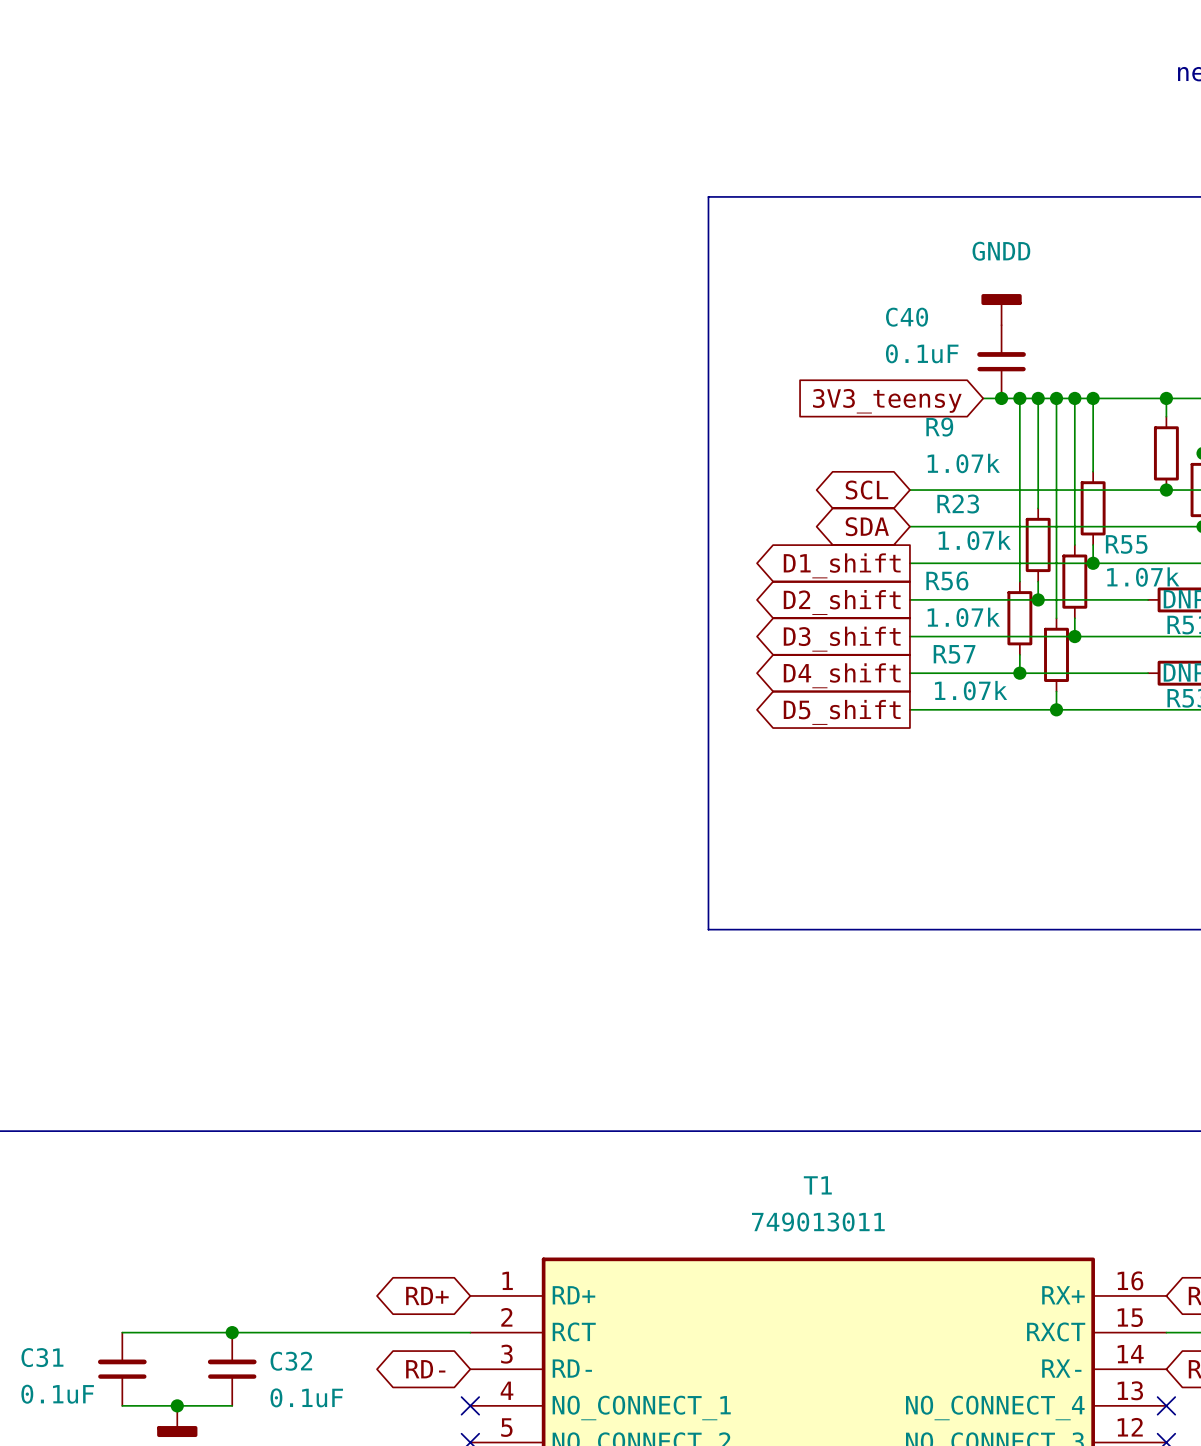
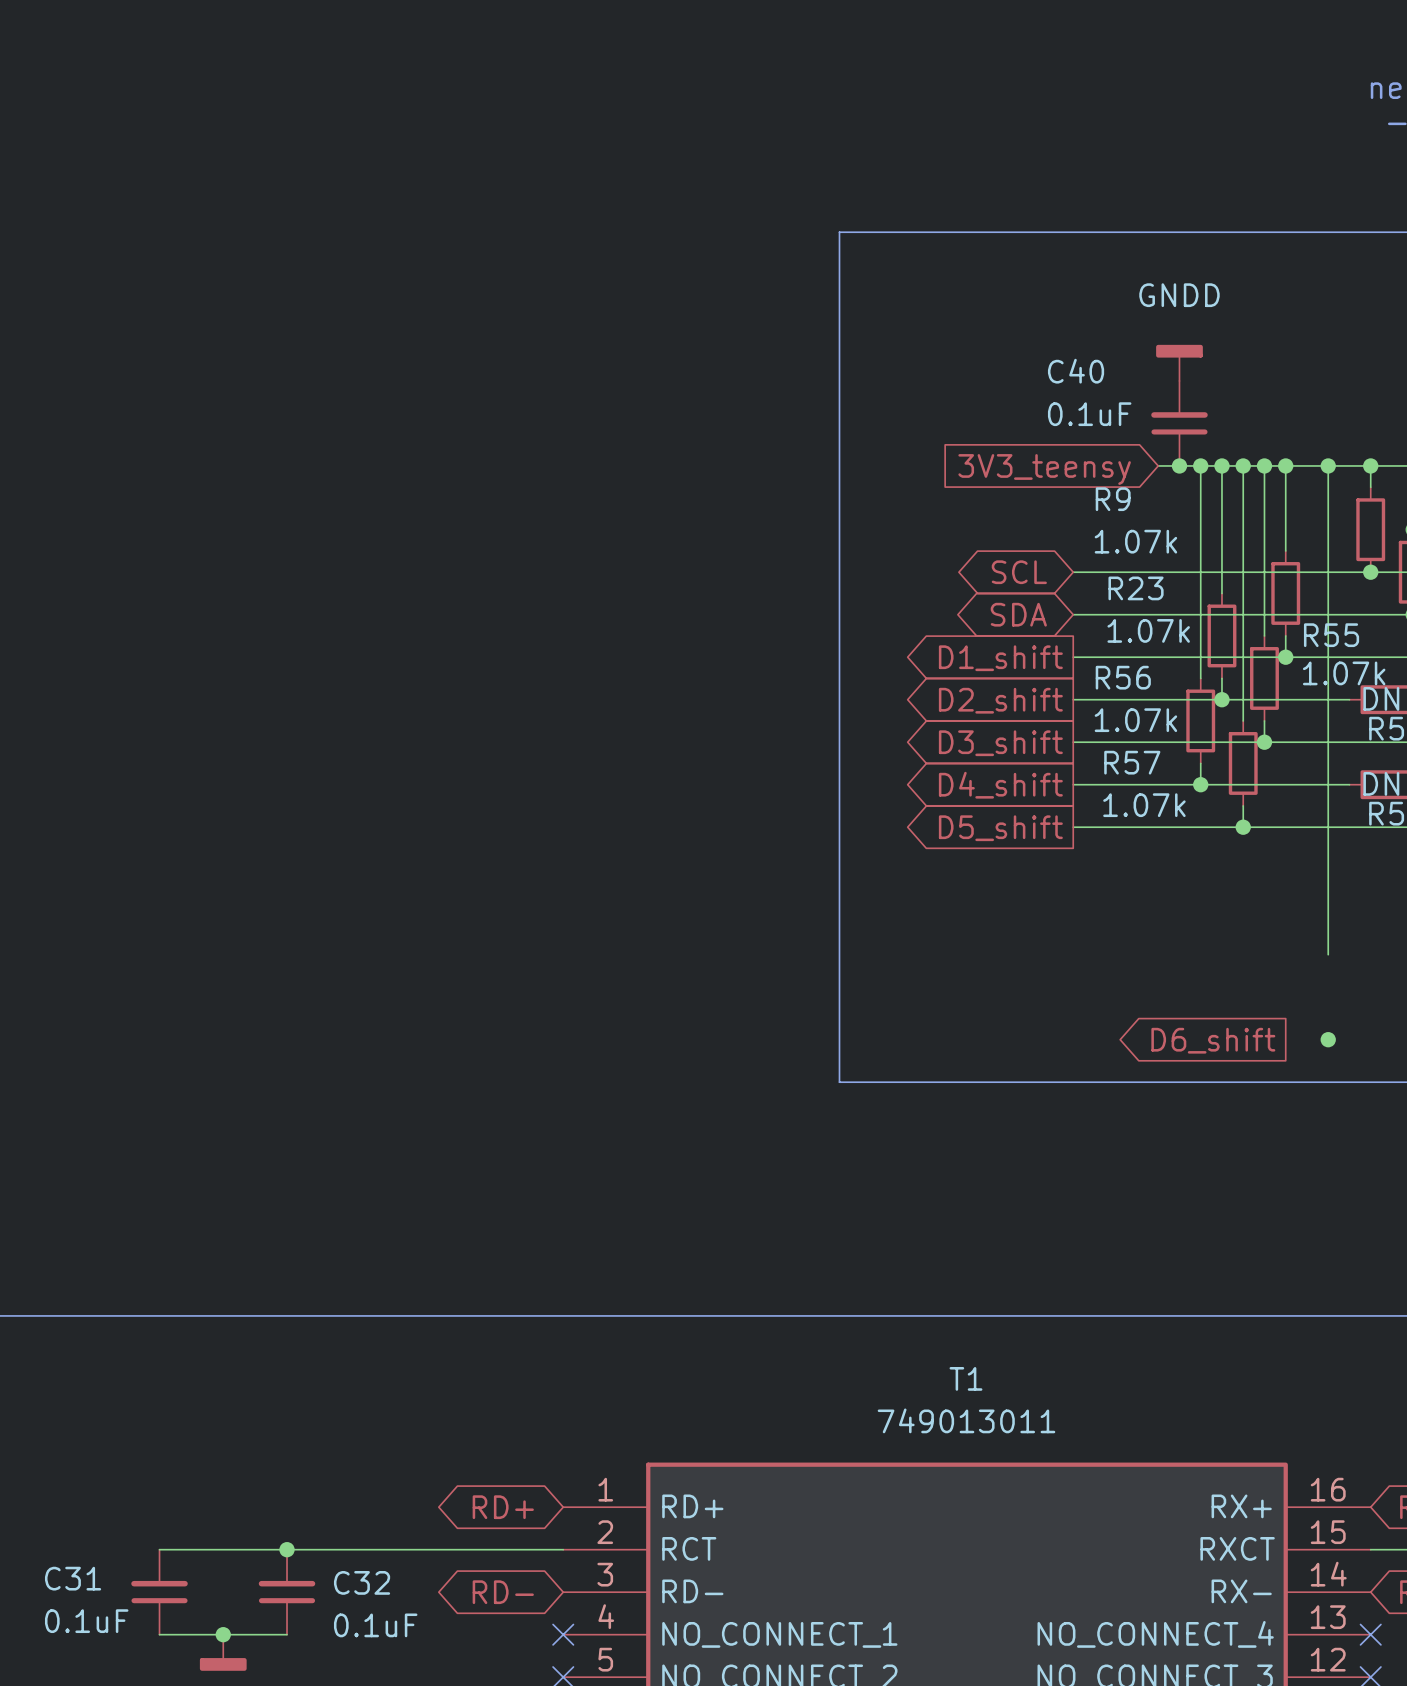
wire: none -> (1328, 465) (1328, 954)
junction: none -> (1328, 465)
junction: none -> (1328, 1039)
global label: none -> D6_shift (1213, 1040)

